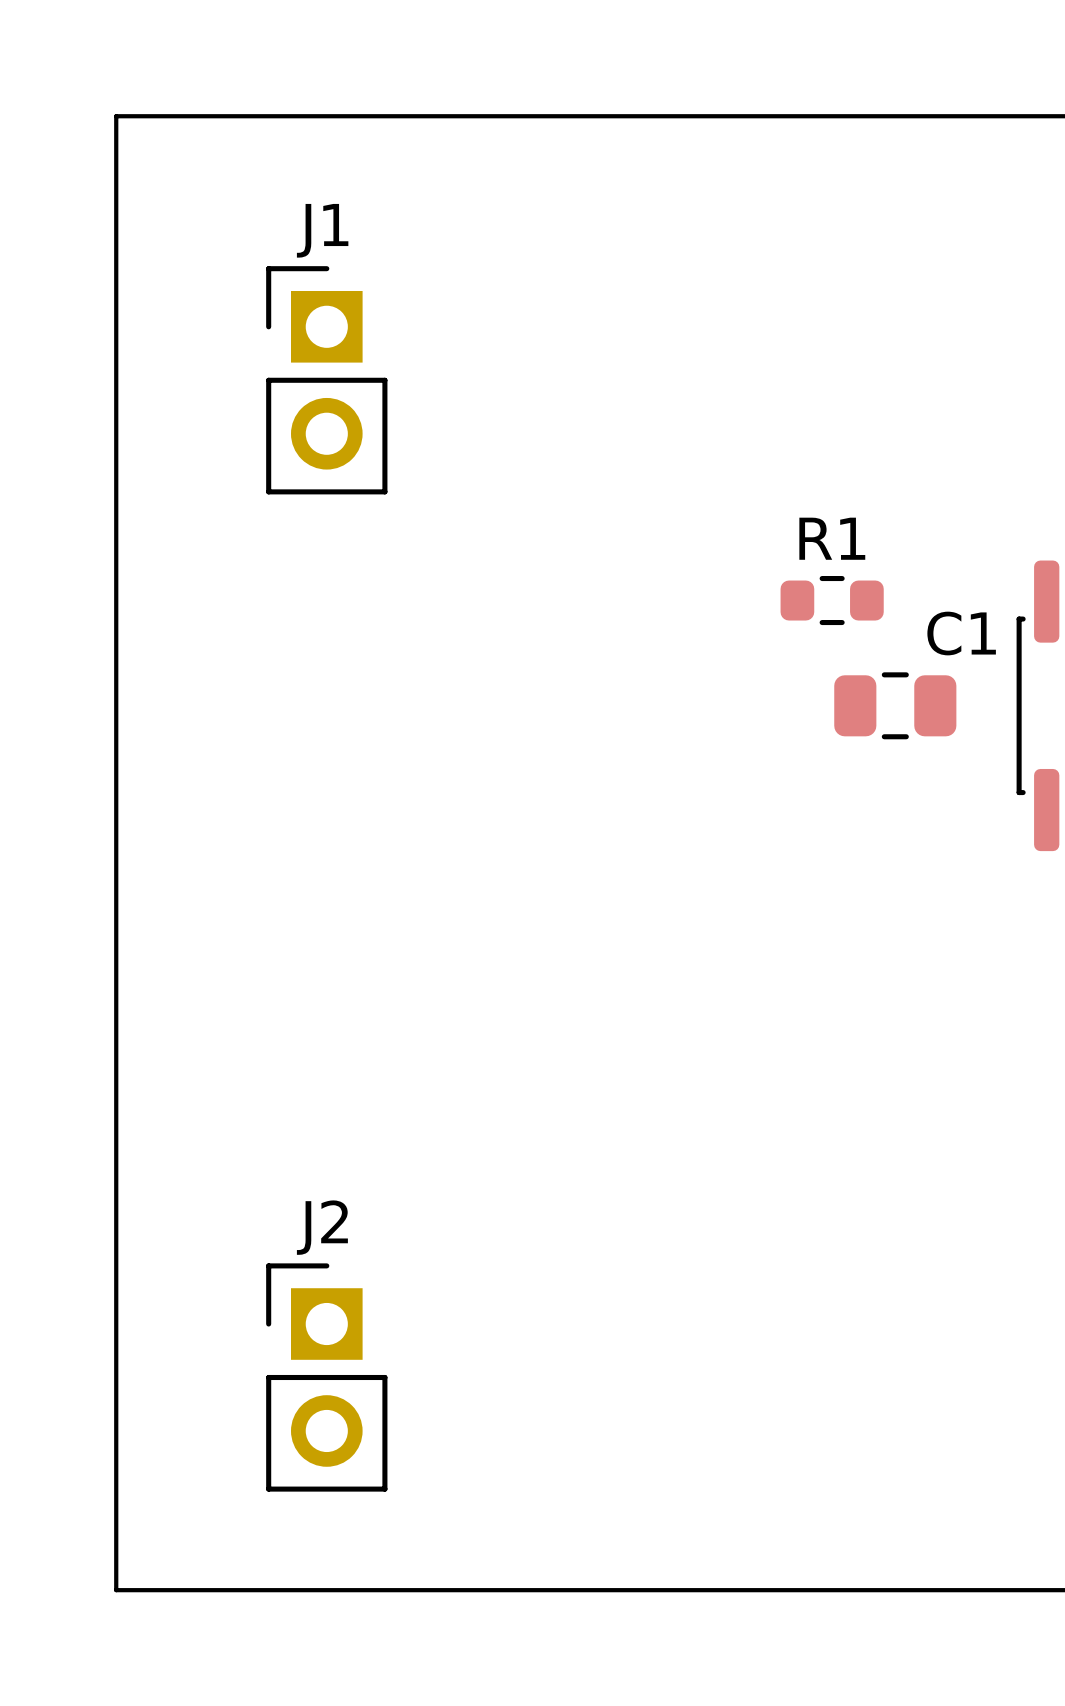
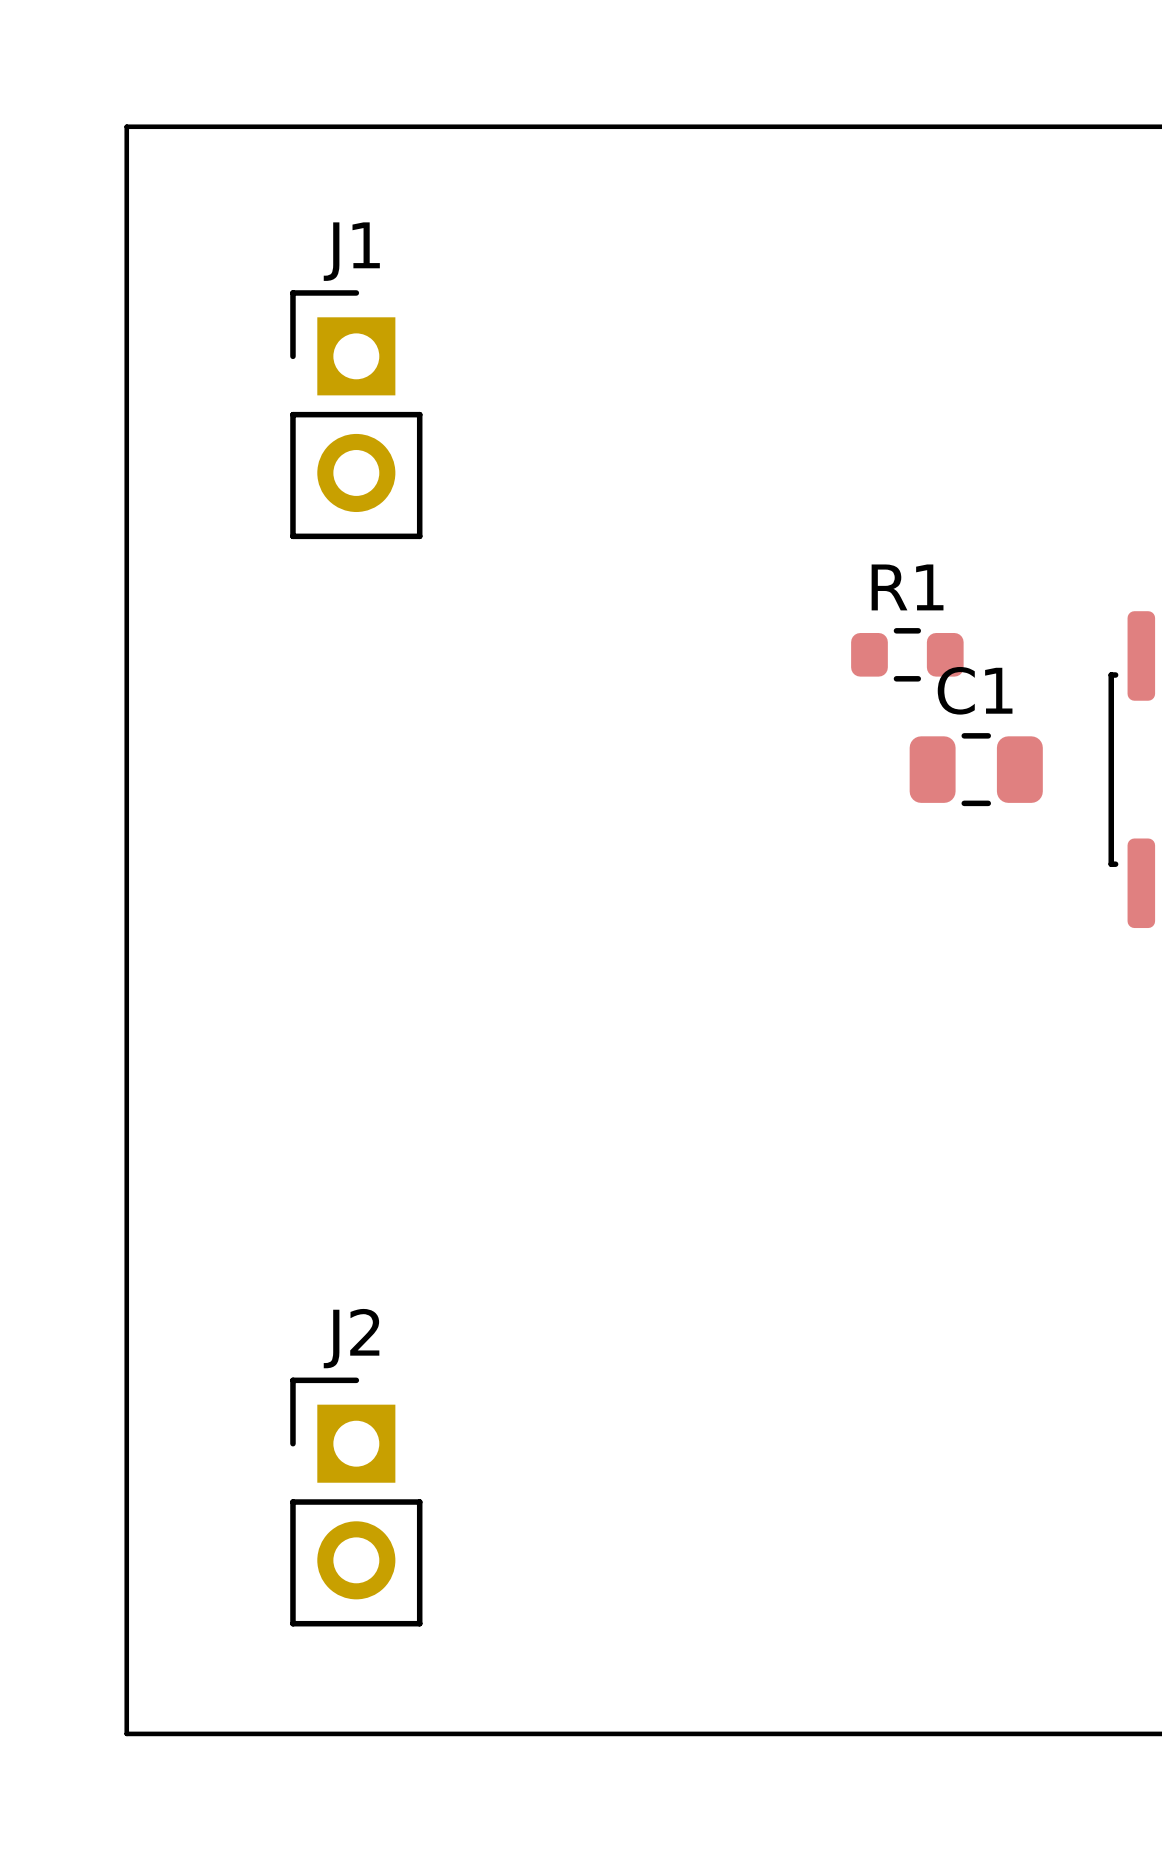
C1 name position: C1 (961, 633) -> C1 (975, 690)

